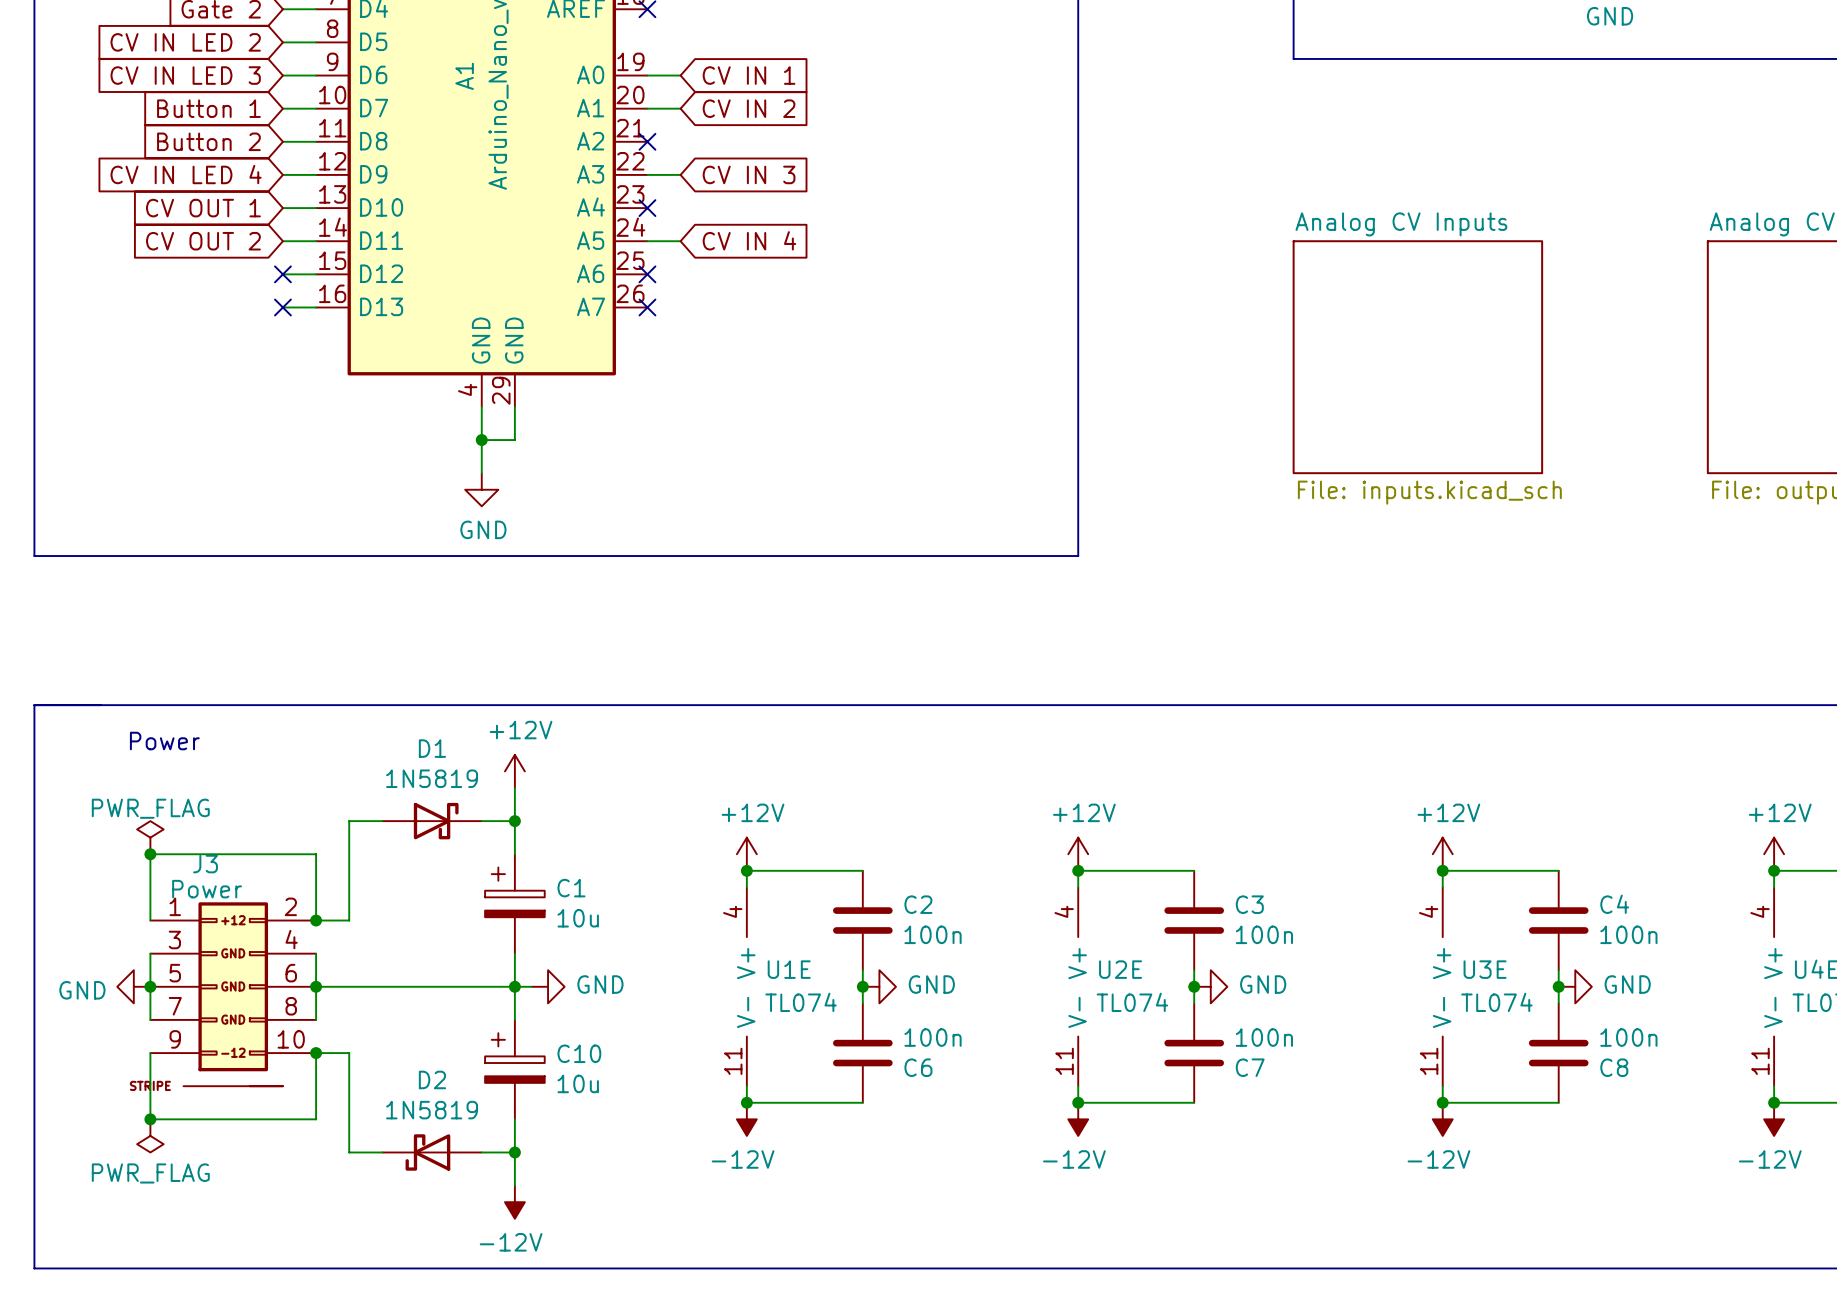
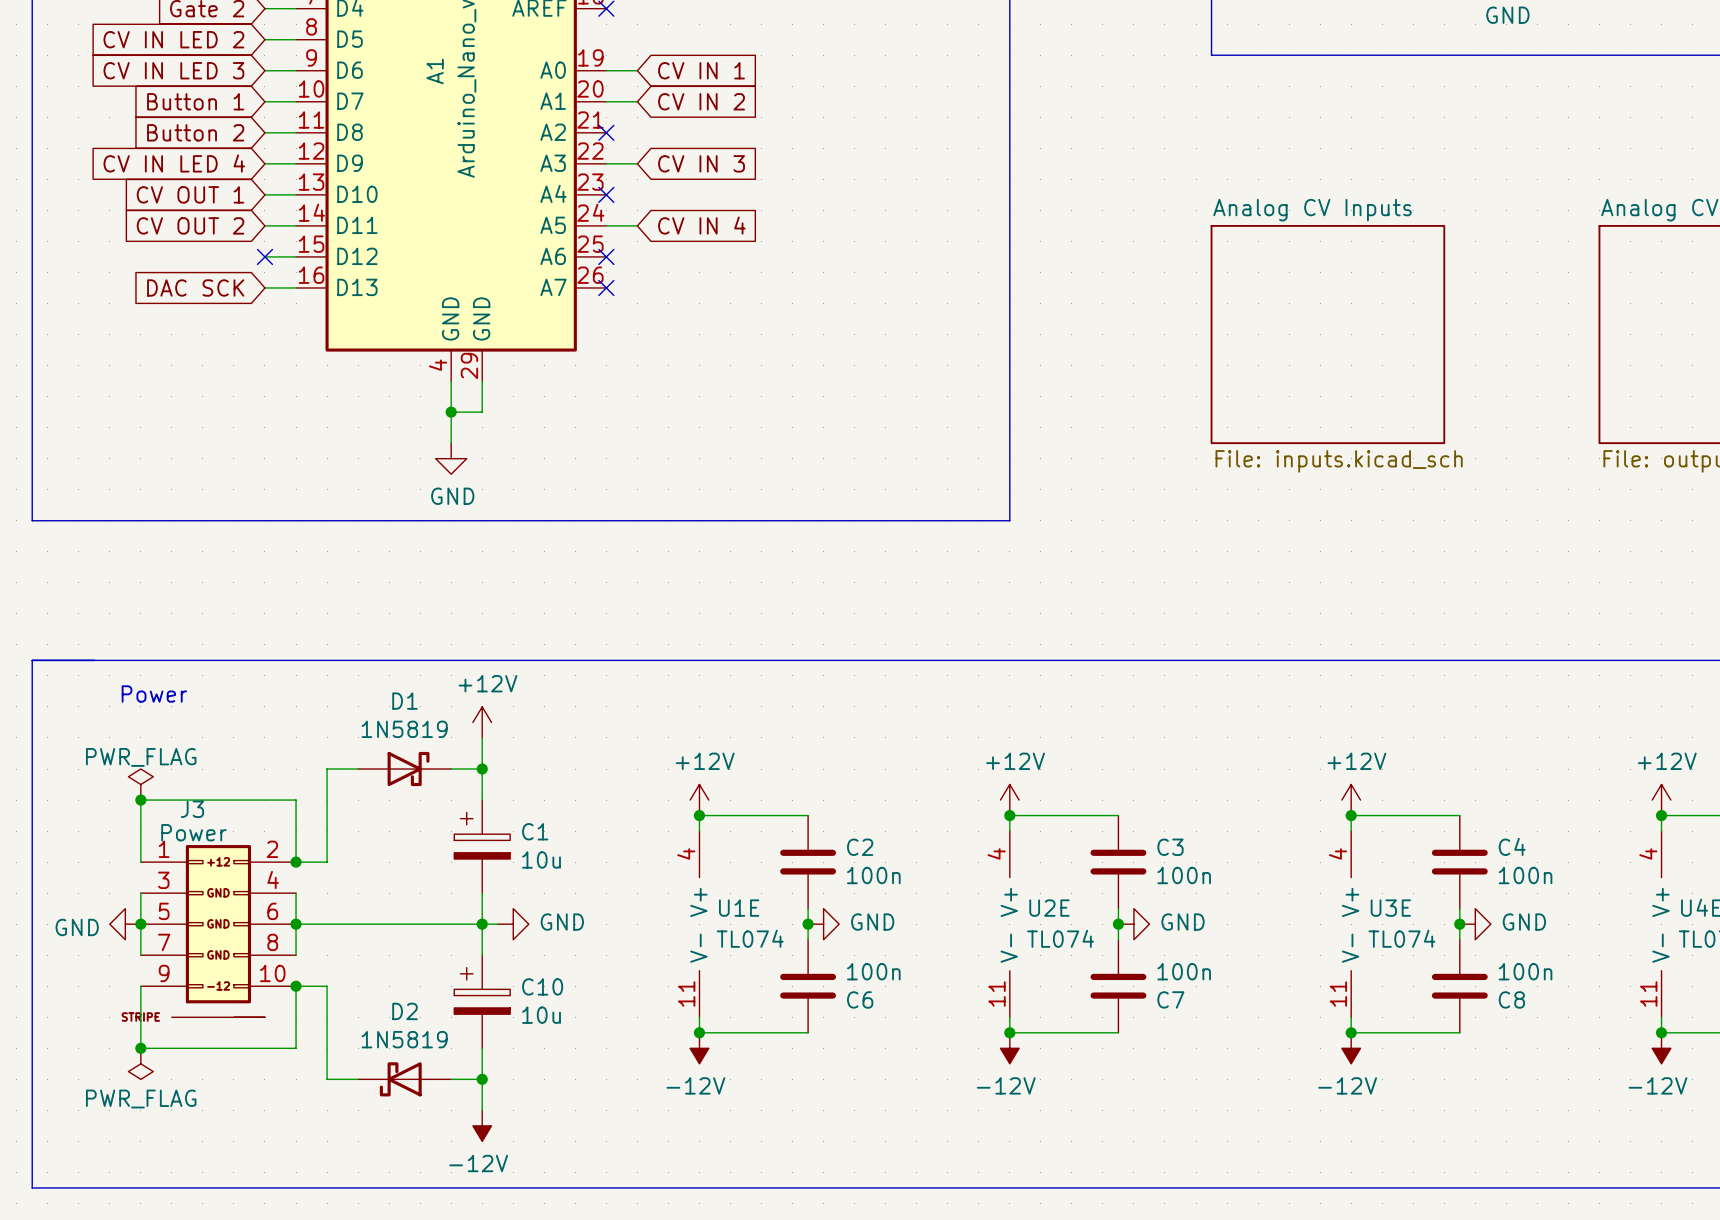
global label: none -> DAC SCK (195, 287)
no-connect mark: (282, 307) -> none

